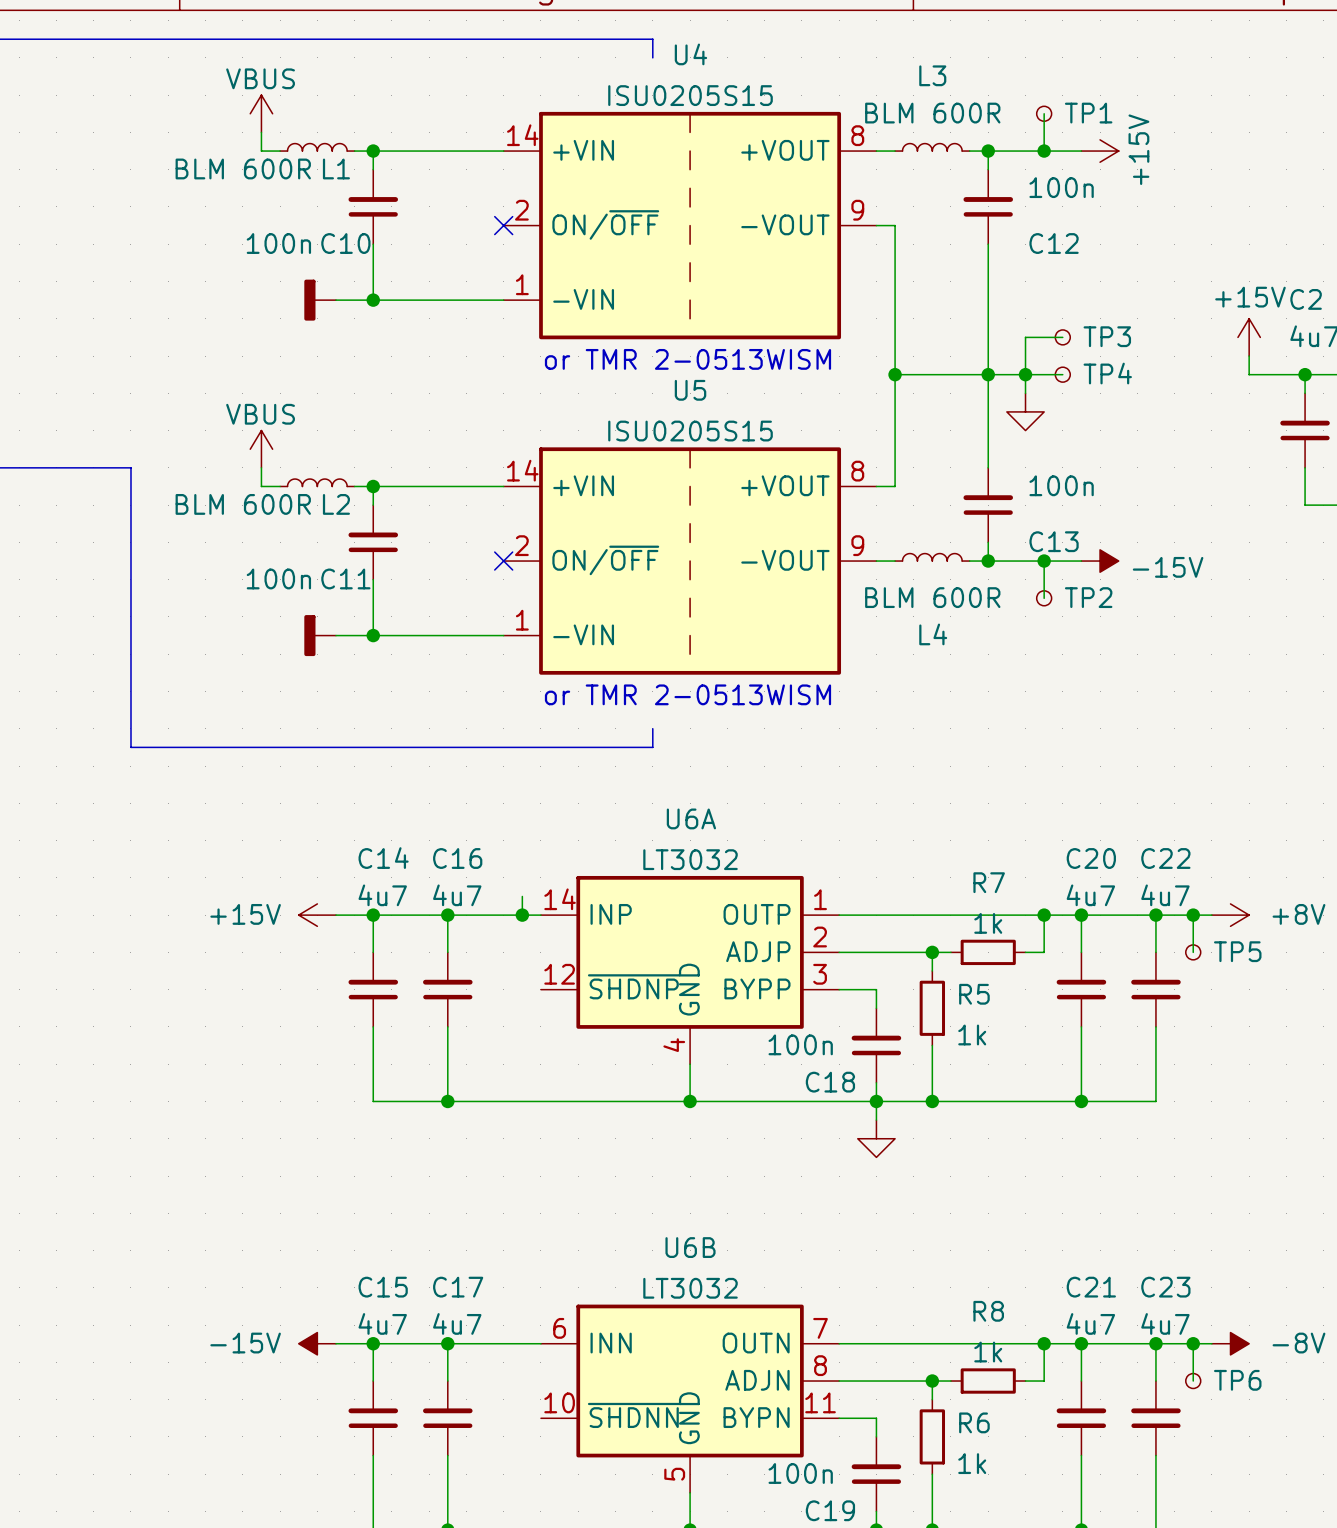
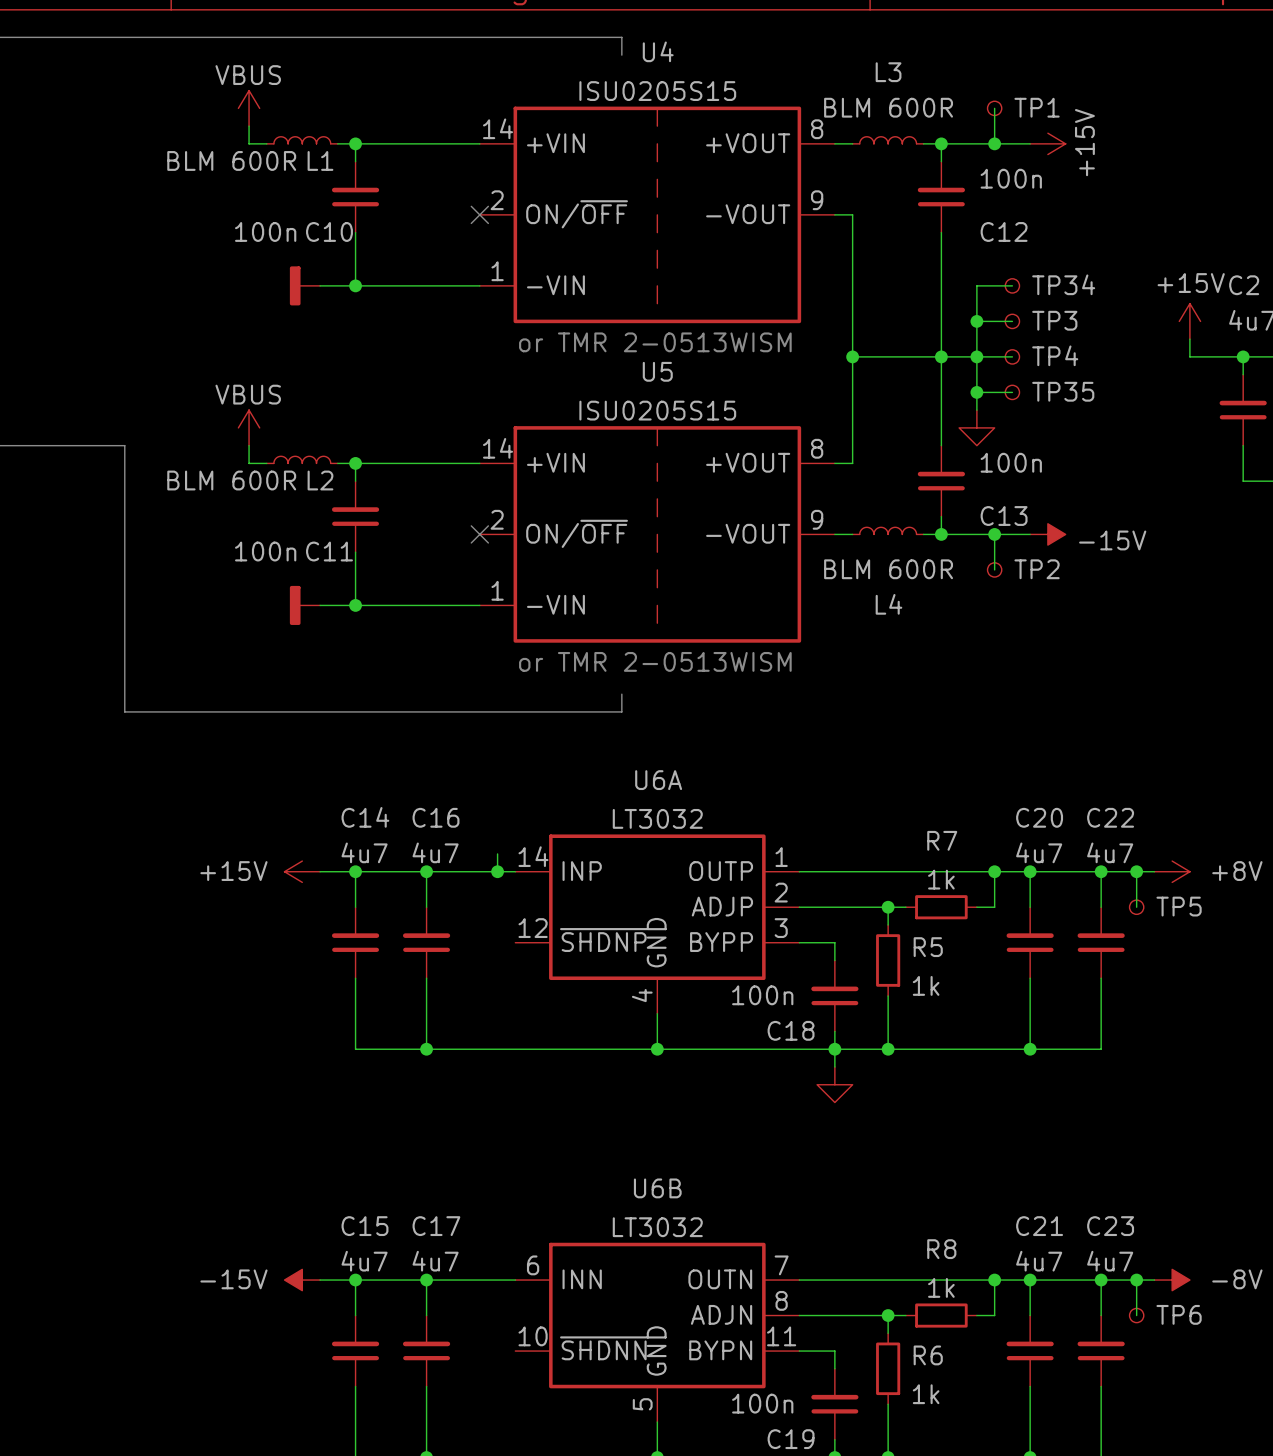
wire: none -> (1012, 285) (976, 285) (976, 321)
TP34: none -> (1012, 285)
junction: none -> (976, 321)
wire: none -> (976, 392) (1012, 392)
power symbol position: (1025, 411) -> (976, 427)
junction: none -> (976, 392)
TP35: none -> (1012, 392)

